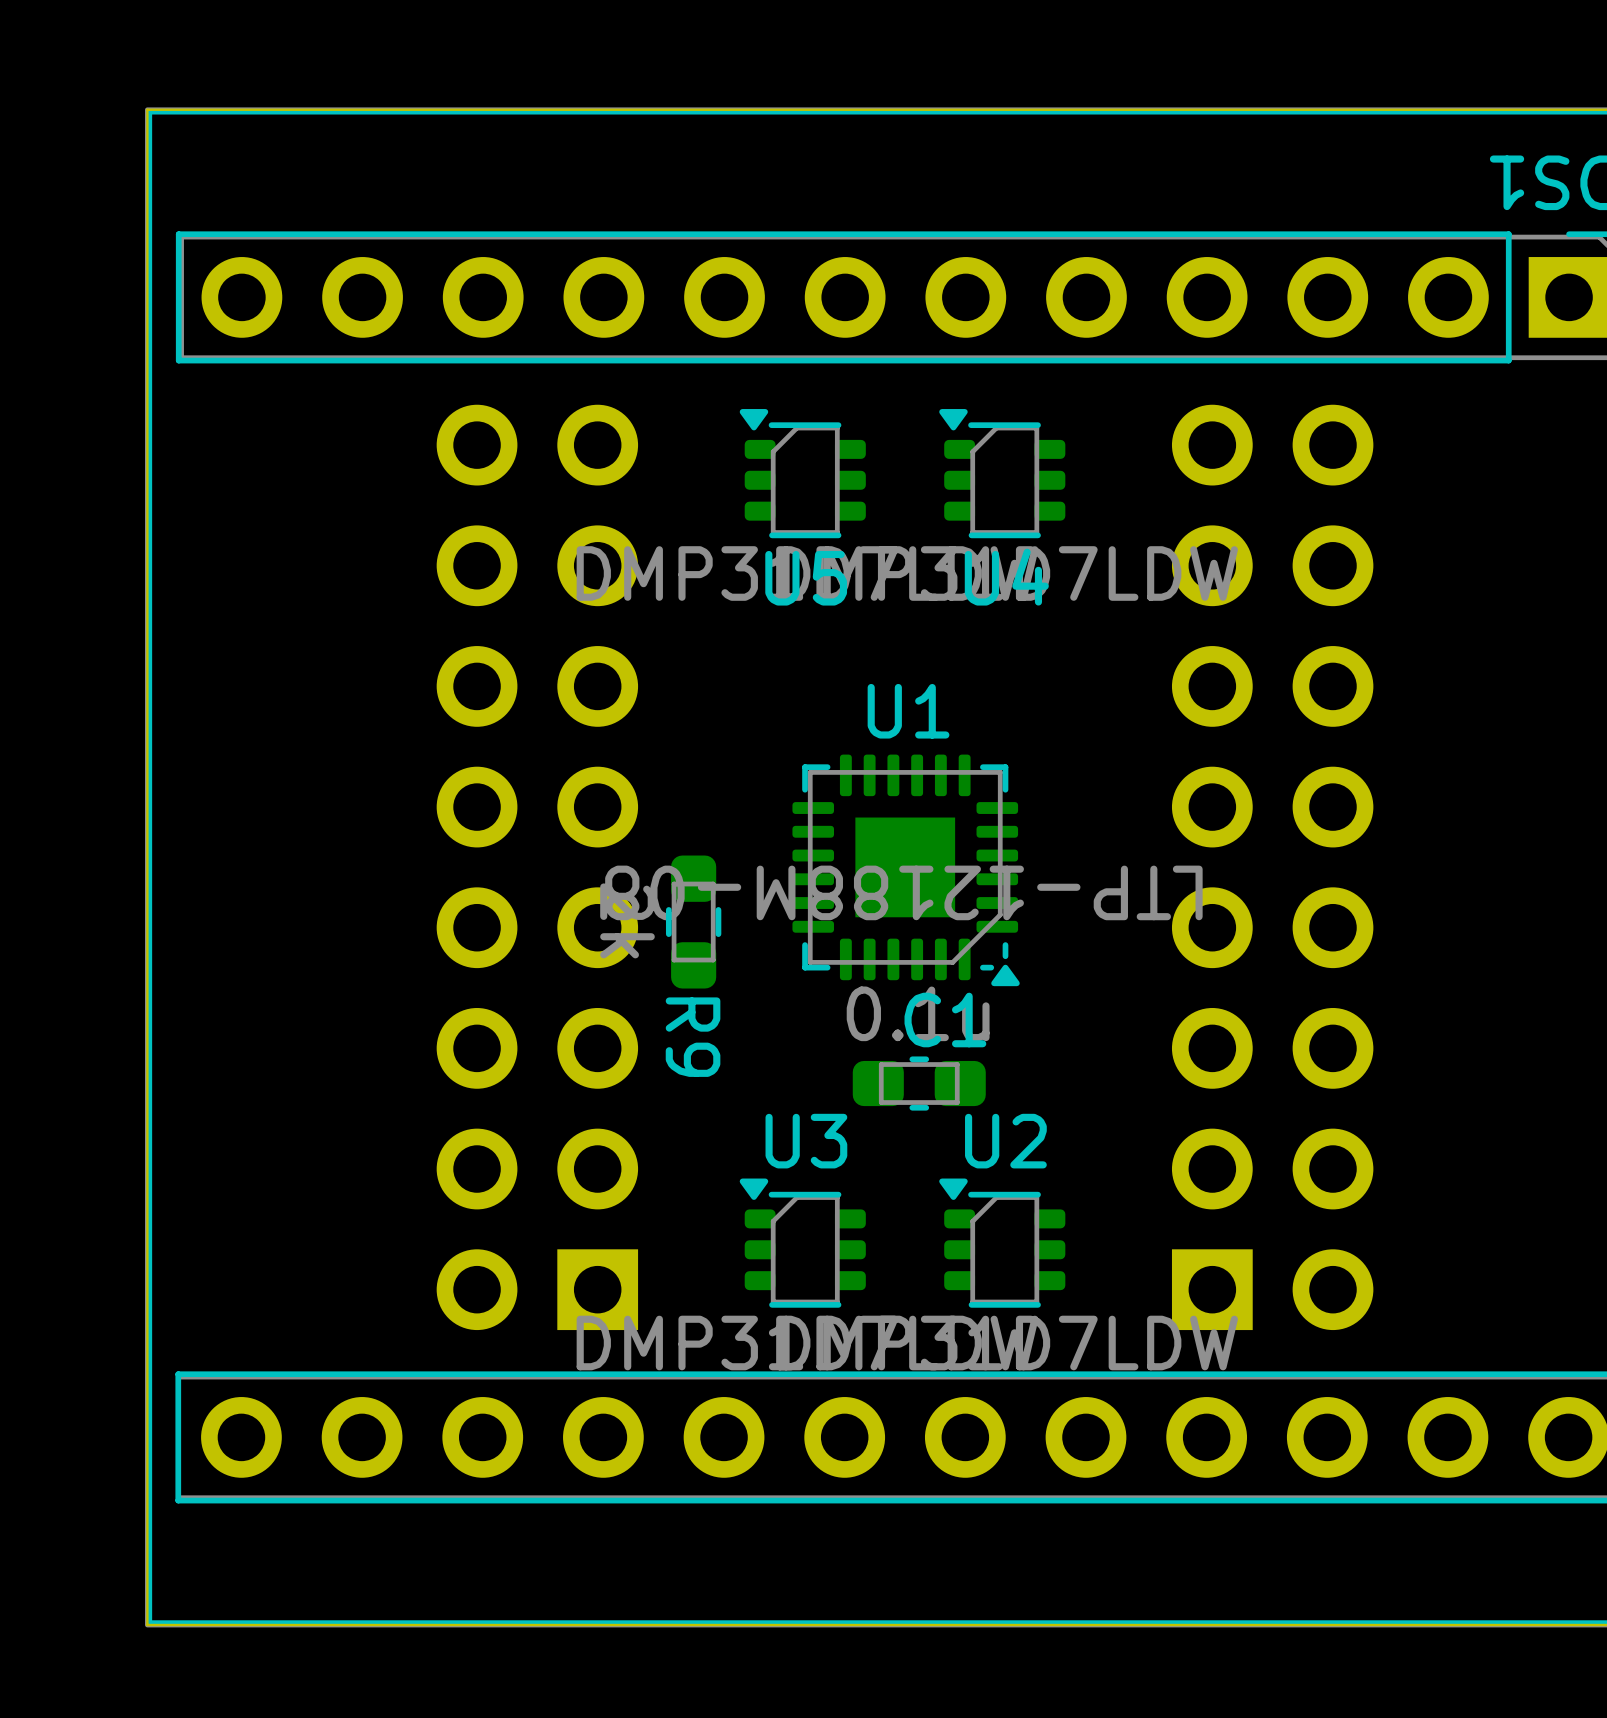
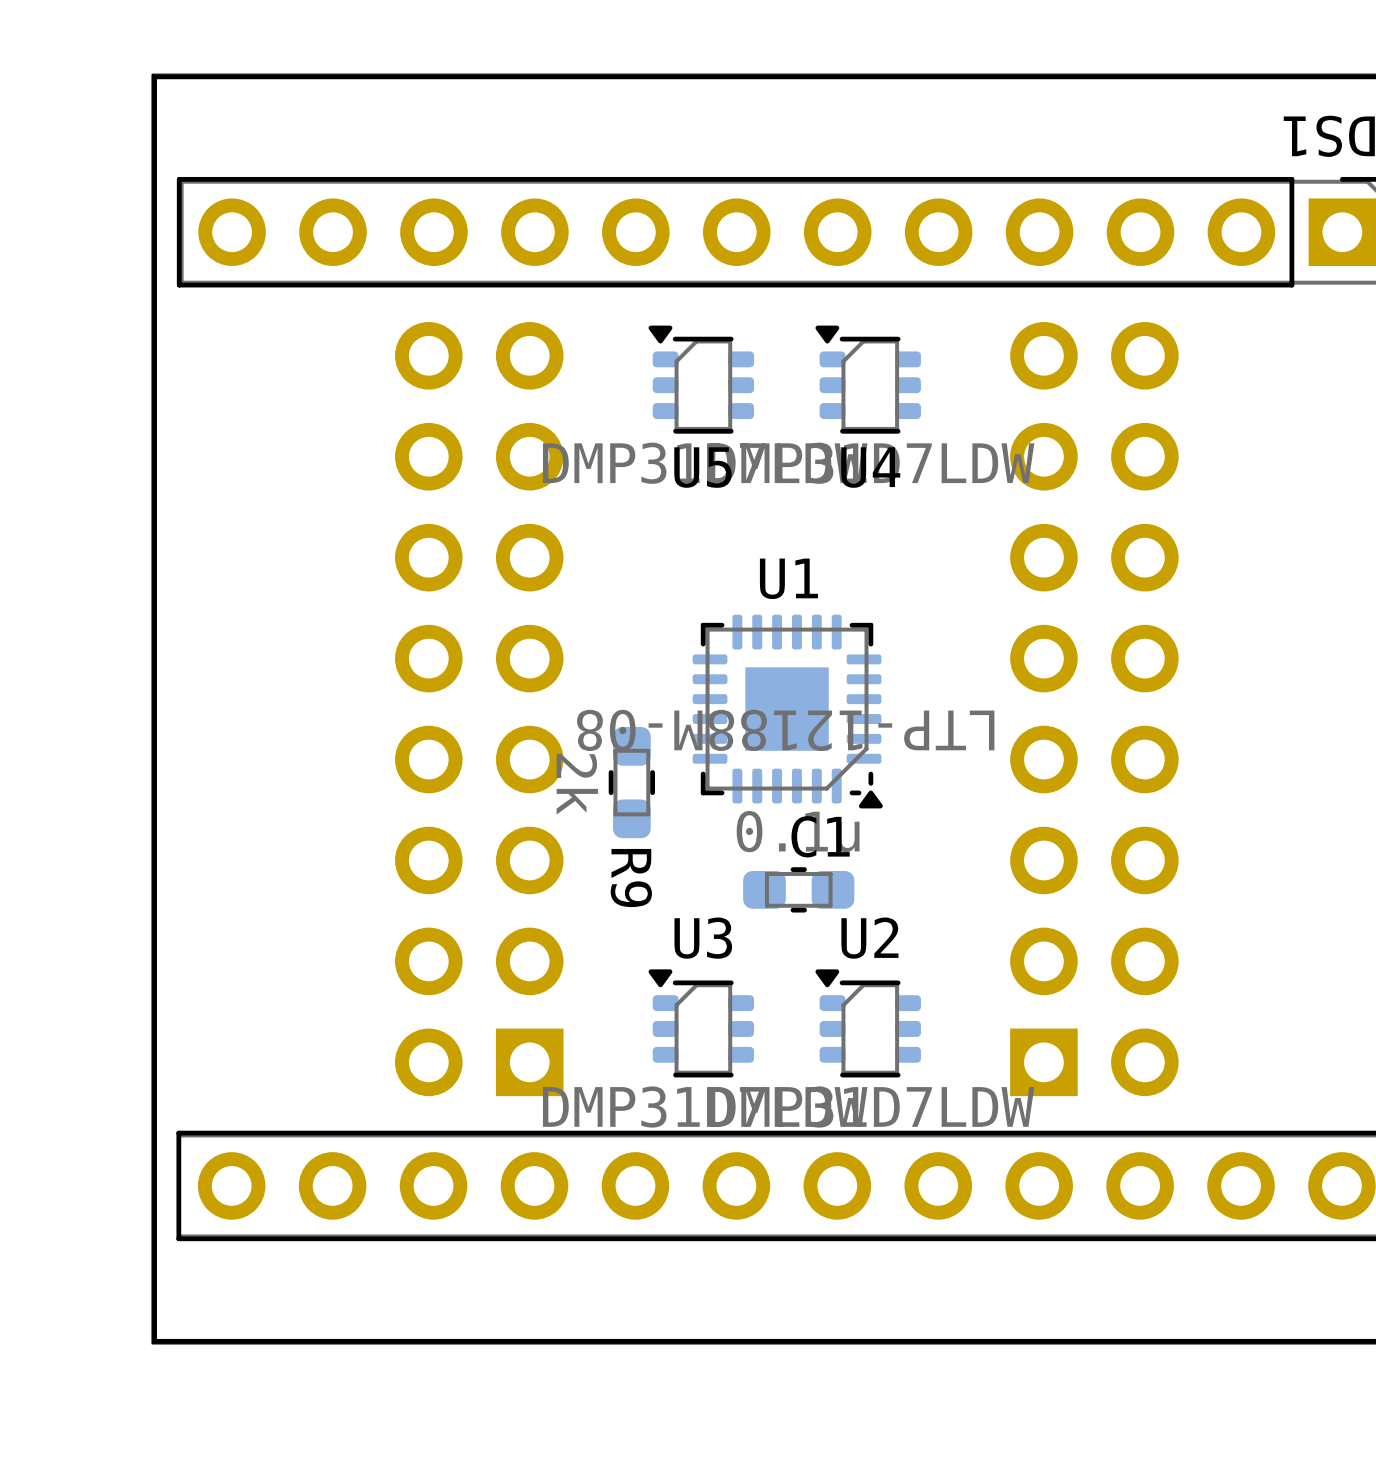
R9 position: (693, 922) -> (631, 782)

